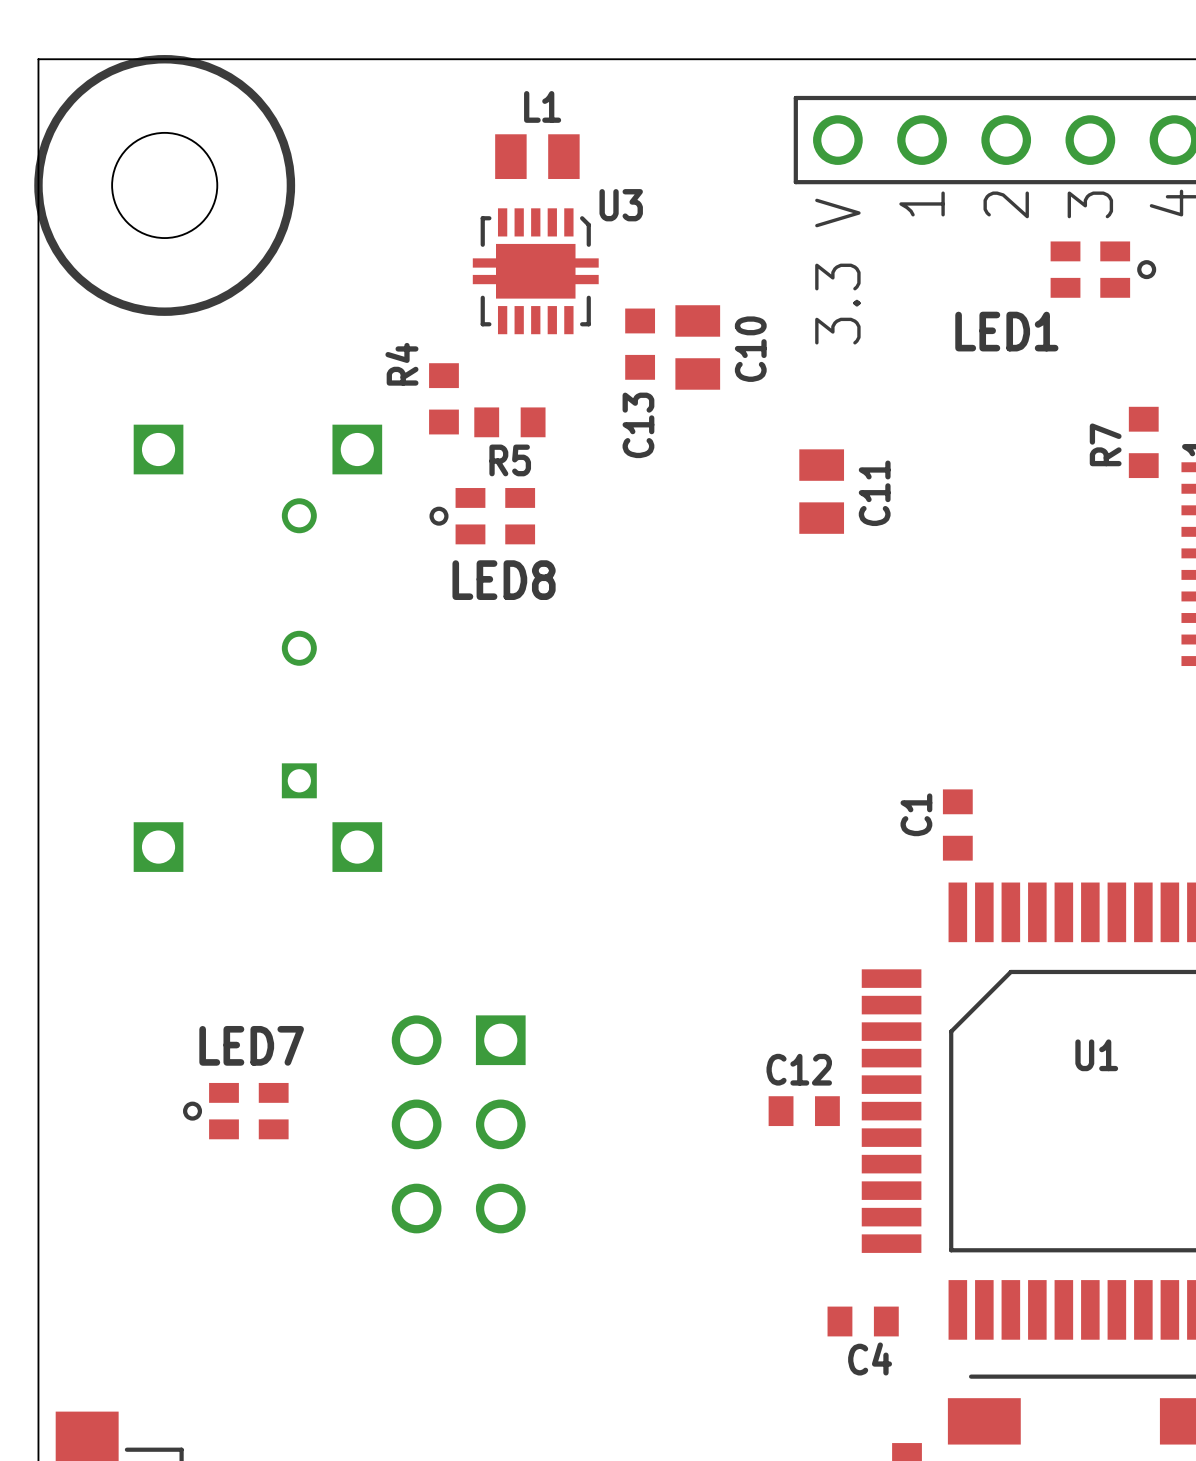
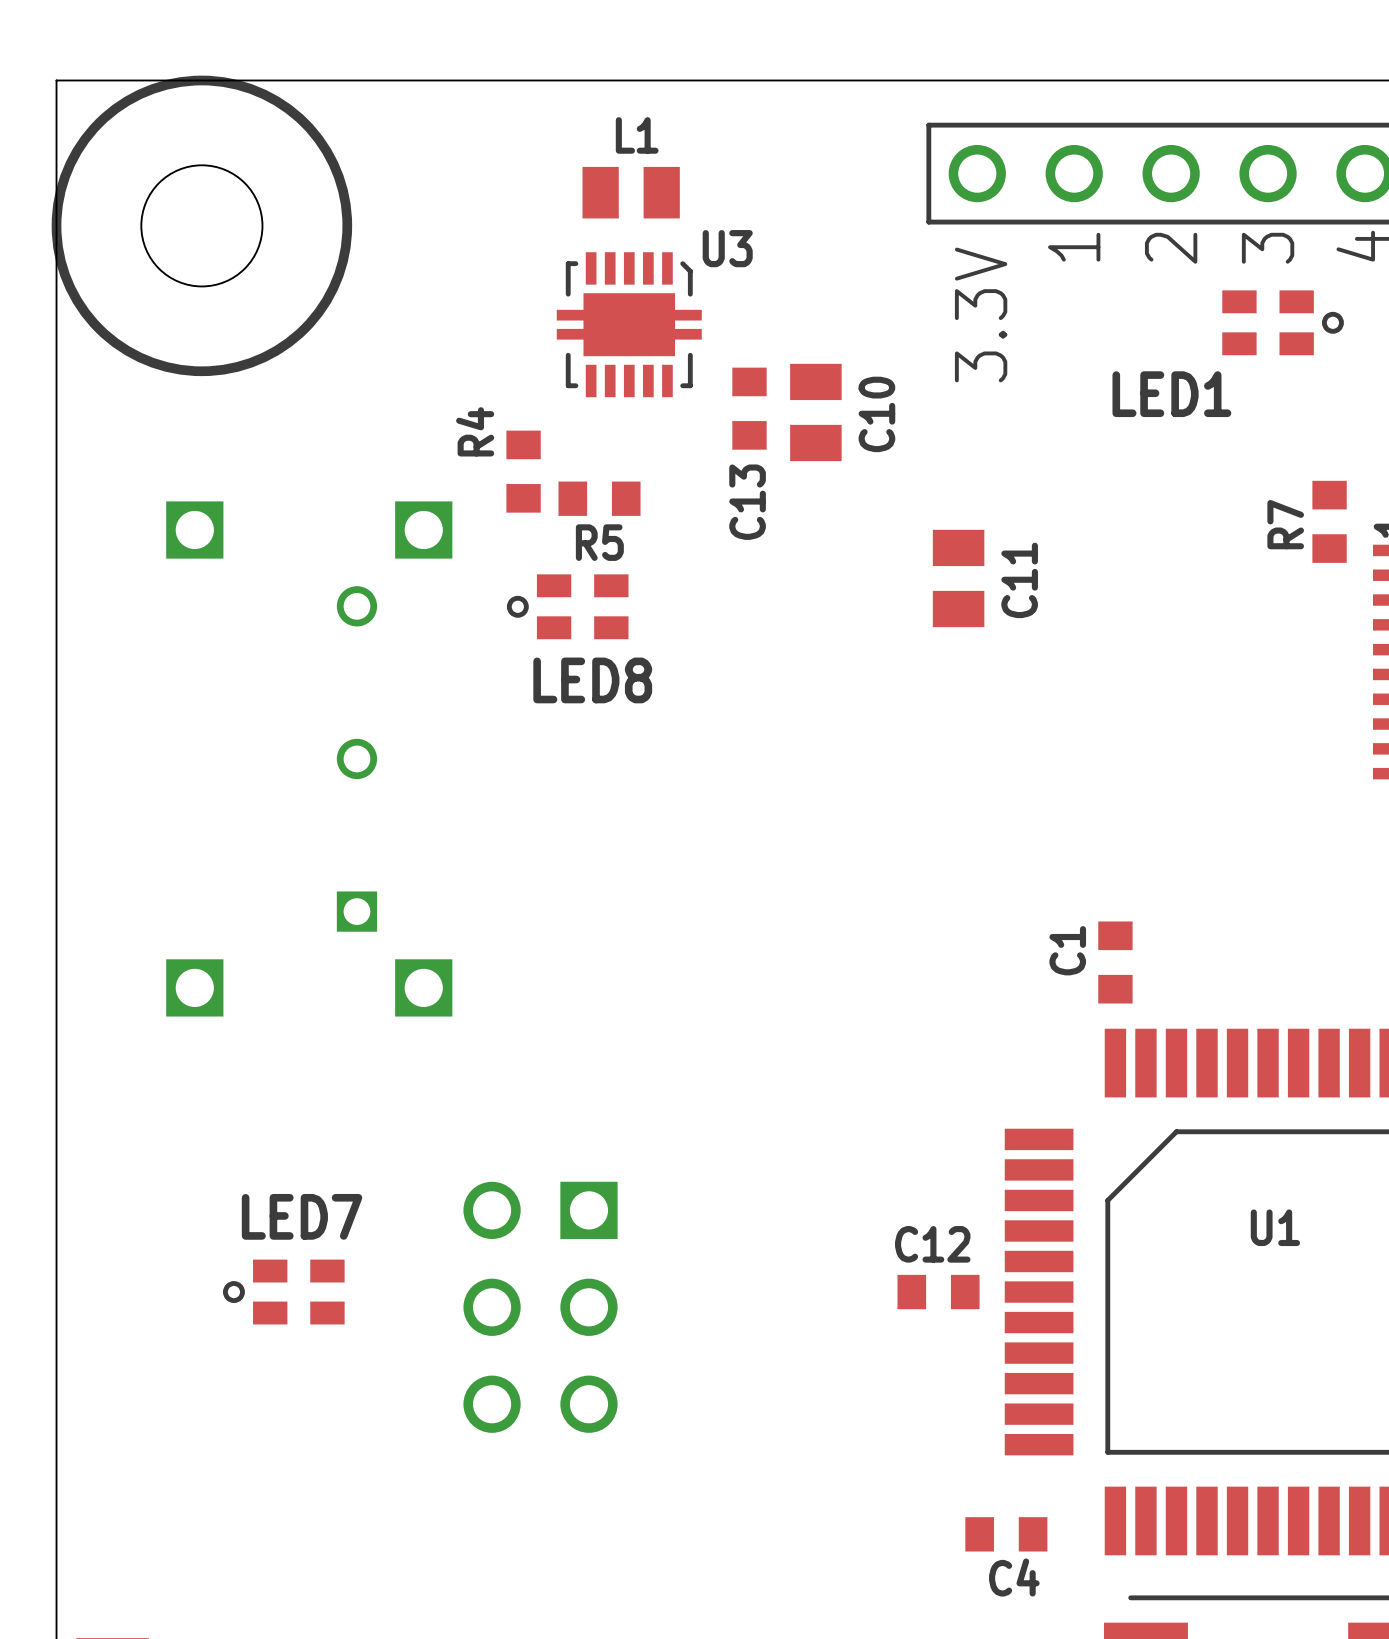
part text: none -> 3.3V (981, 314)
part text: 3.3 V (837, 271) -> none

